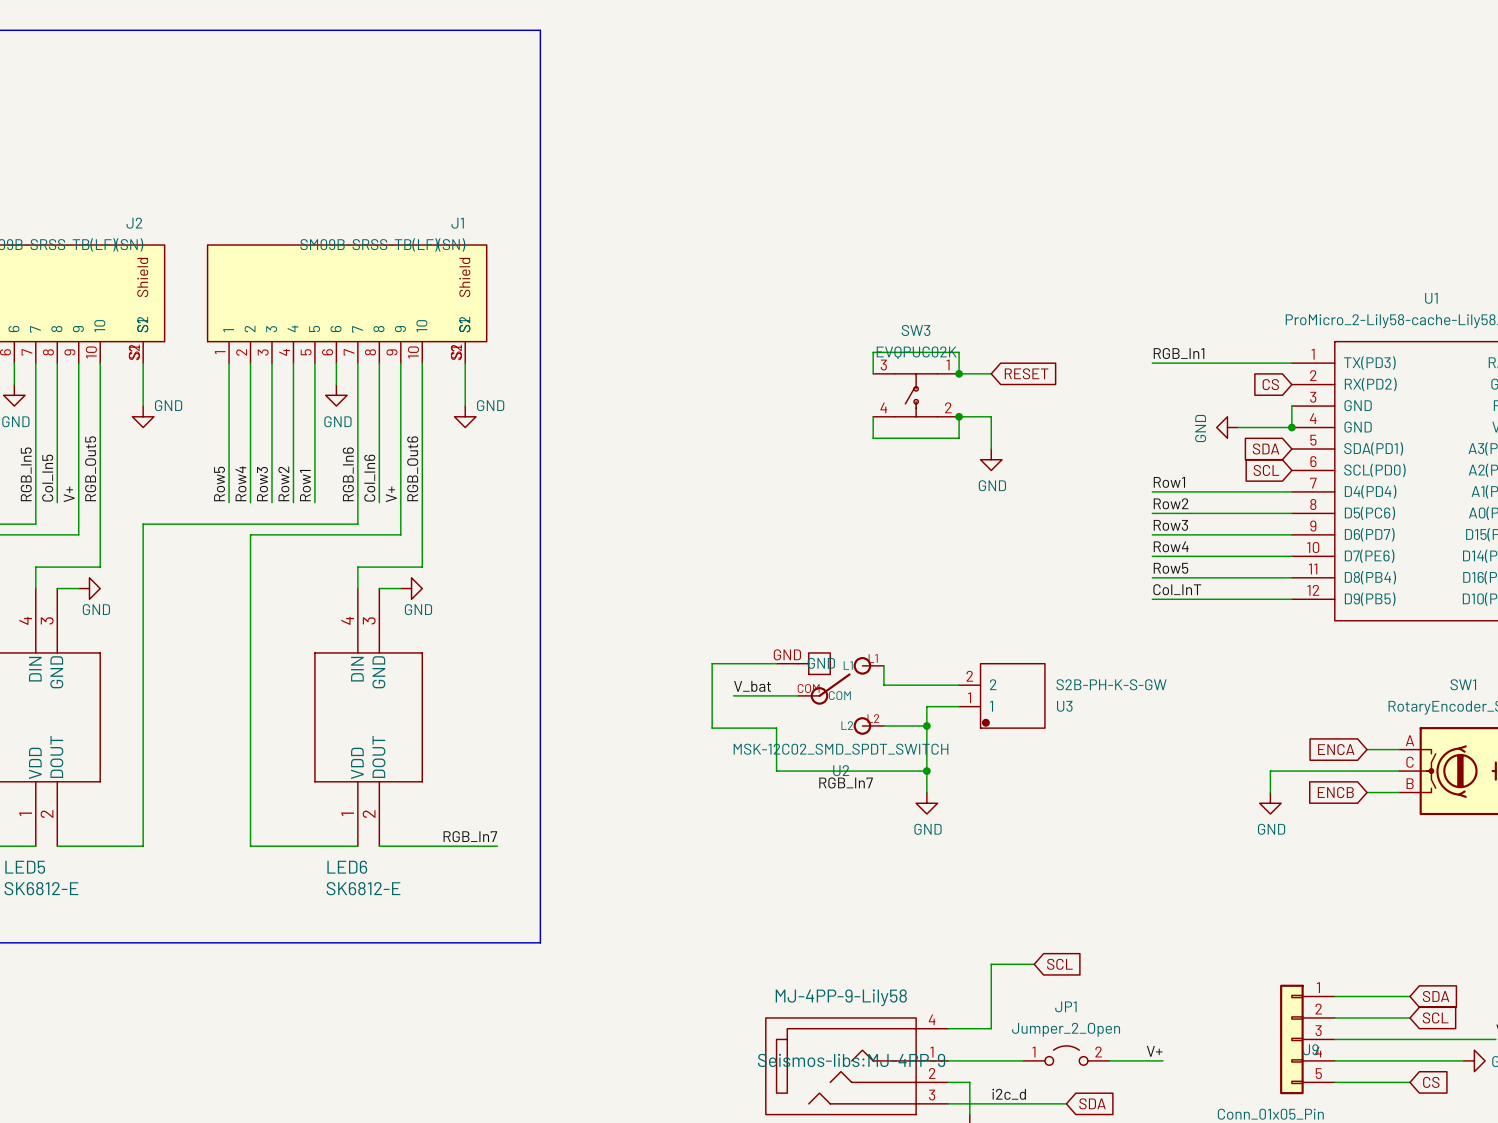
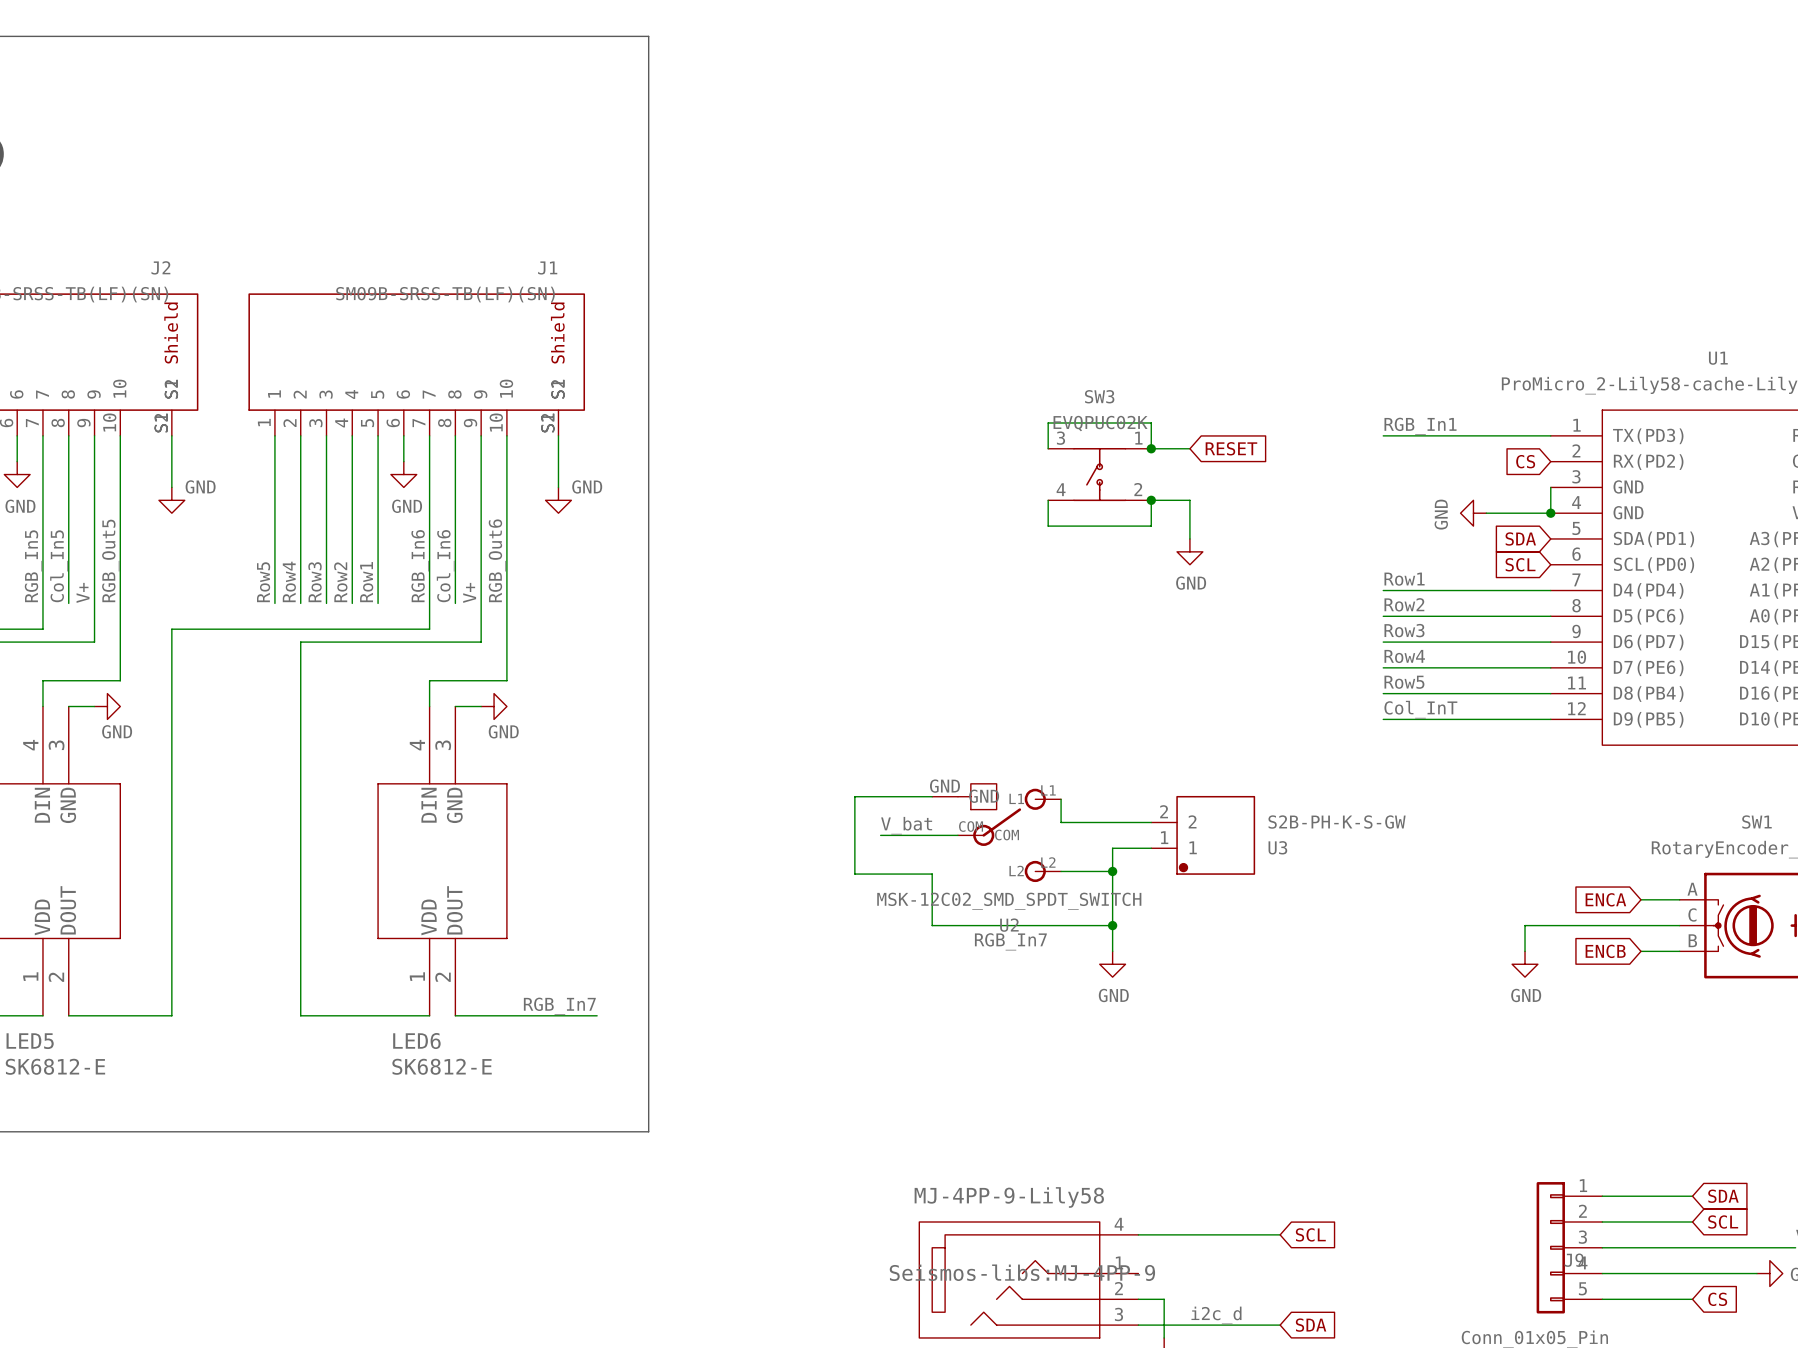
wire: (1034, 964) (991, 964) (991, 1028) -> (1280, 1234) (1189, 1234)
global label position: SCL (1059, 964) -> SCL (1310, 1234)
label: V+ (1154, 1051) -> none
JP1: Jumper_2_Open (1066, 1055) -> none
wire: (948, 1060) (1023, 1060) -> none
wire: (1109, 1060) (1163, 1060) -> none

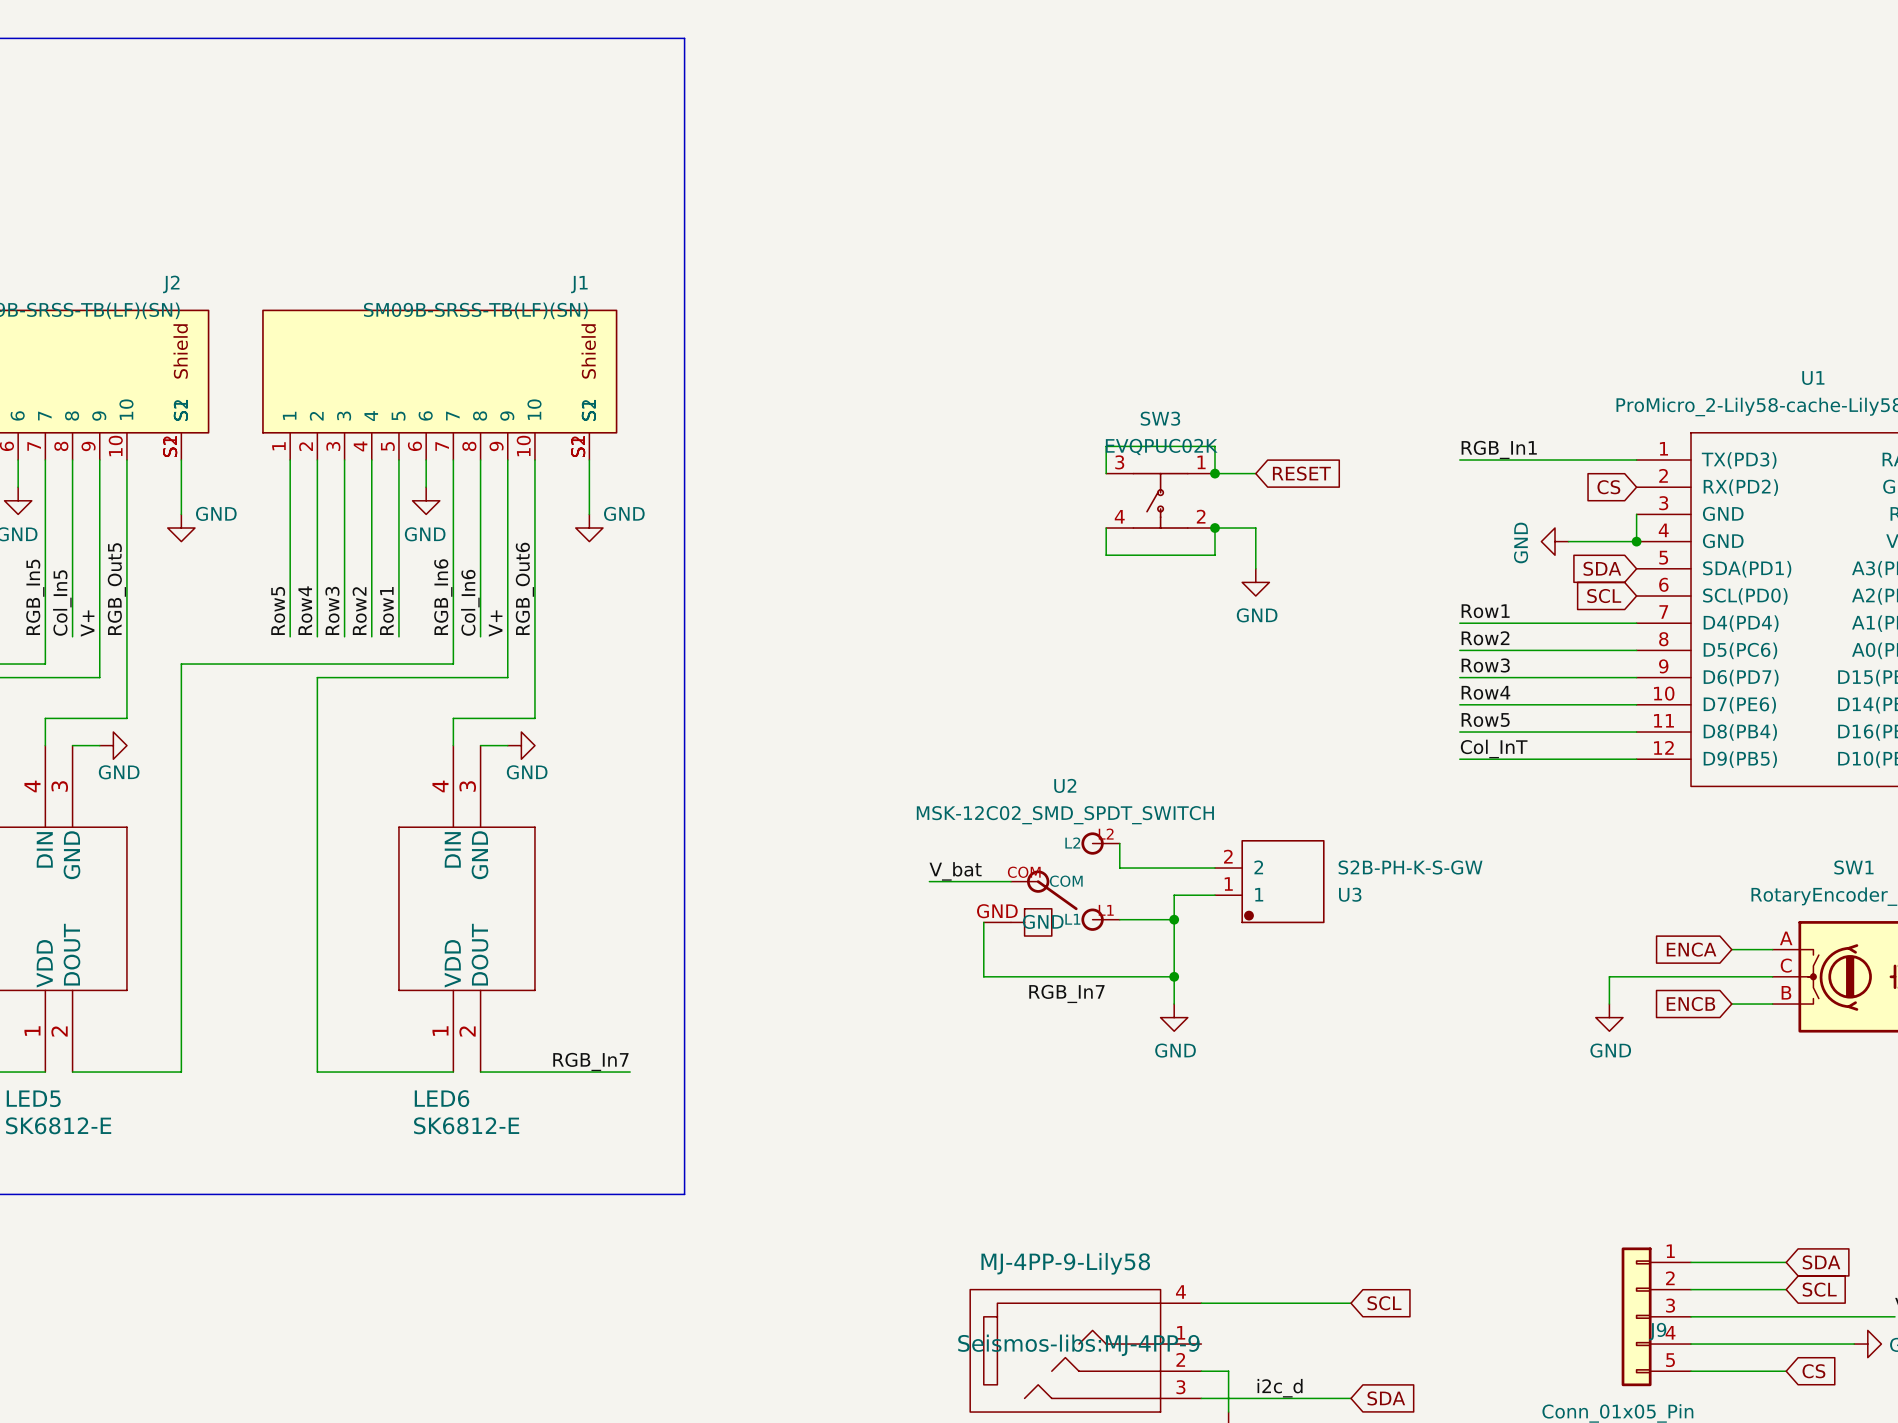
wire: (932, 796) (854, 796) (854, 874) (932, 874) -> none
U2 flip: as is (1001, 832) -> up-down (1057, 884)

